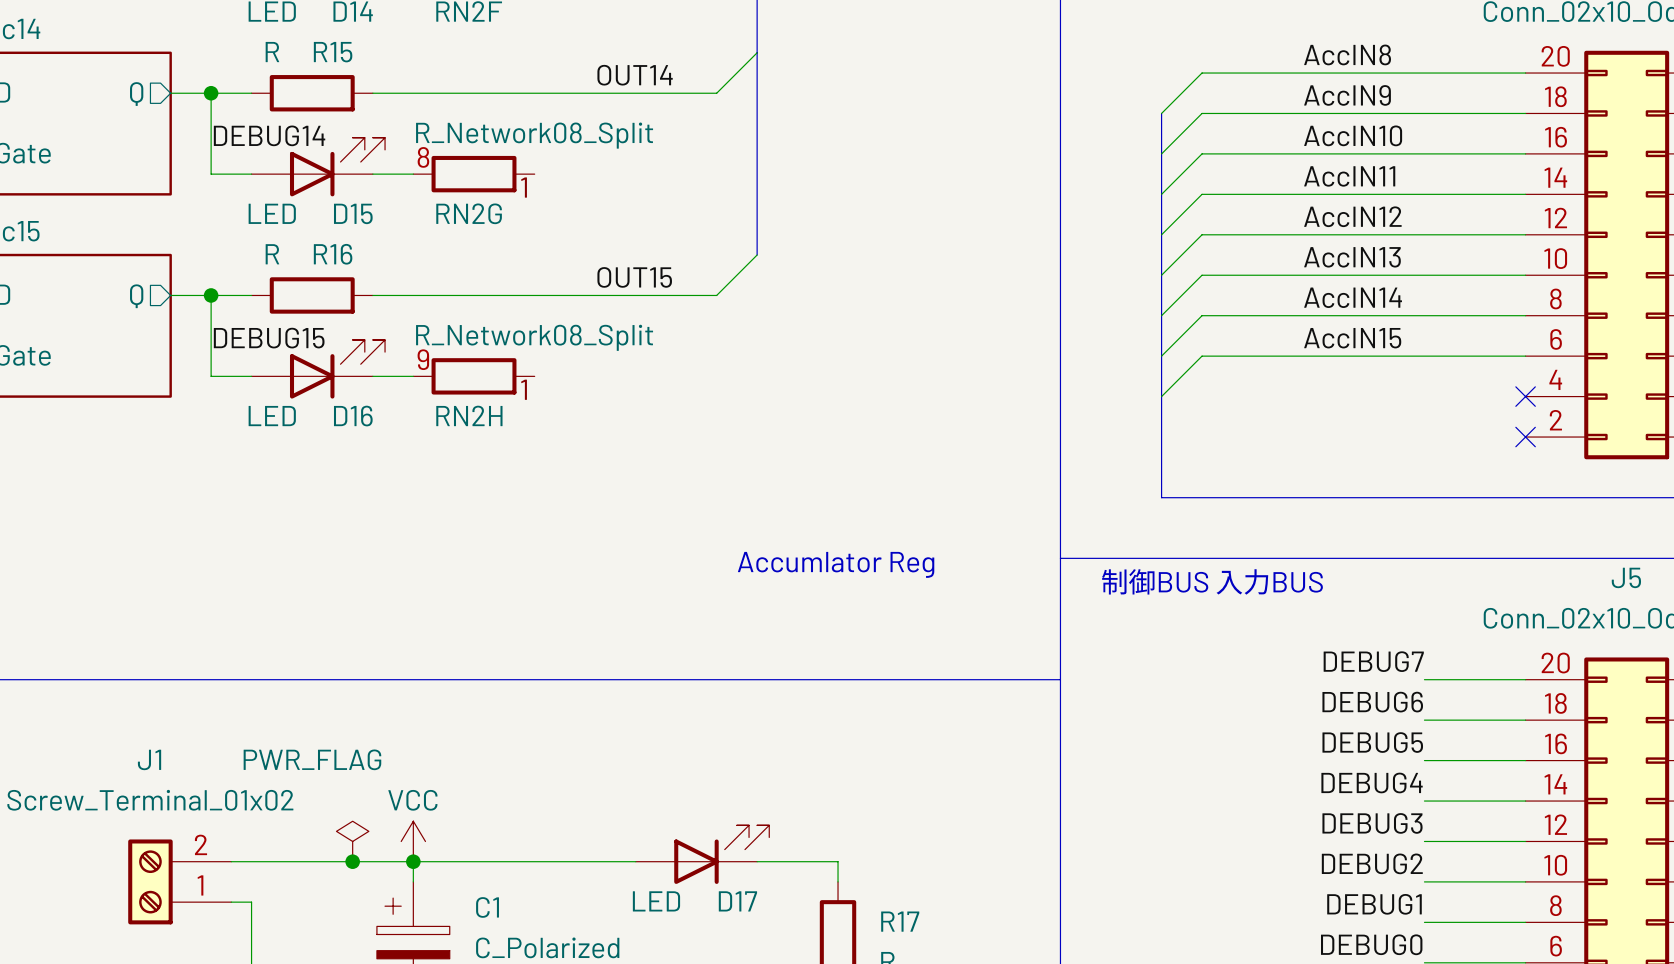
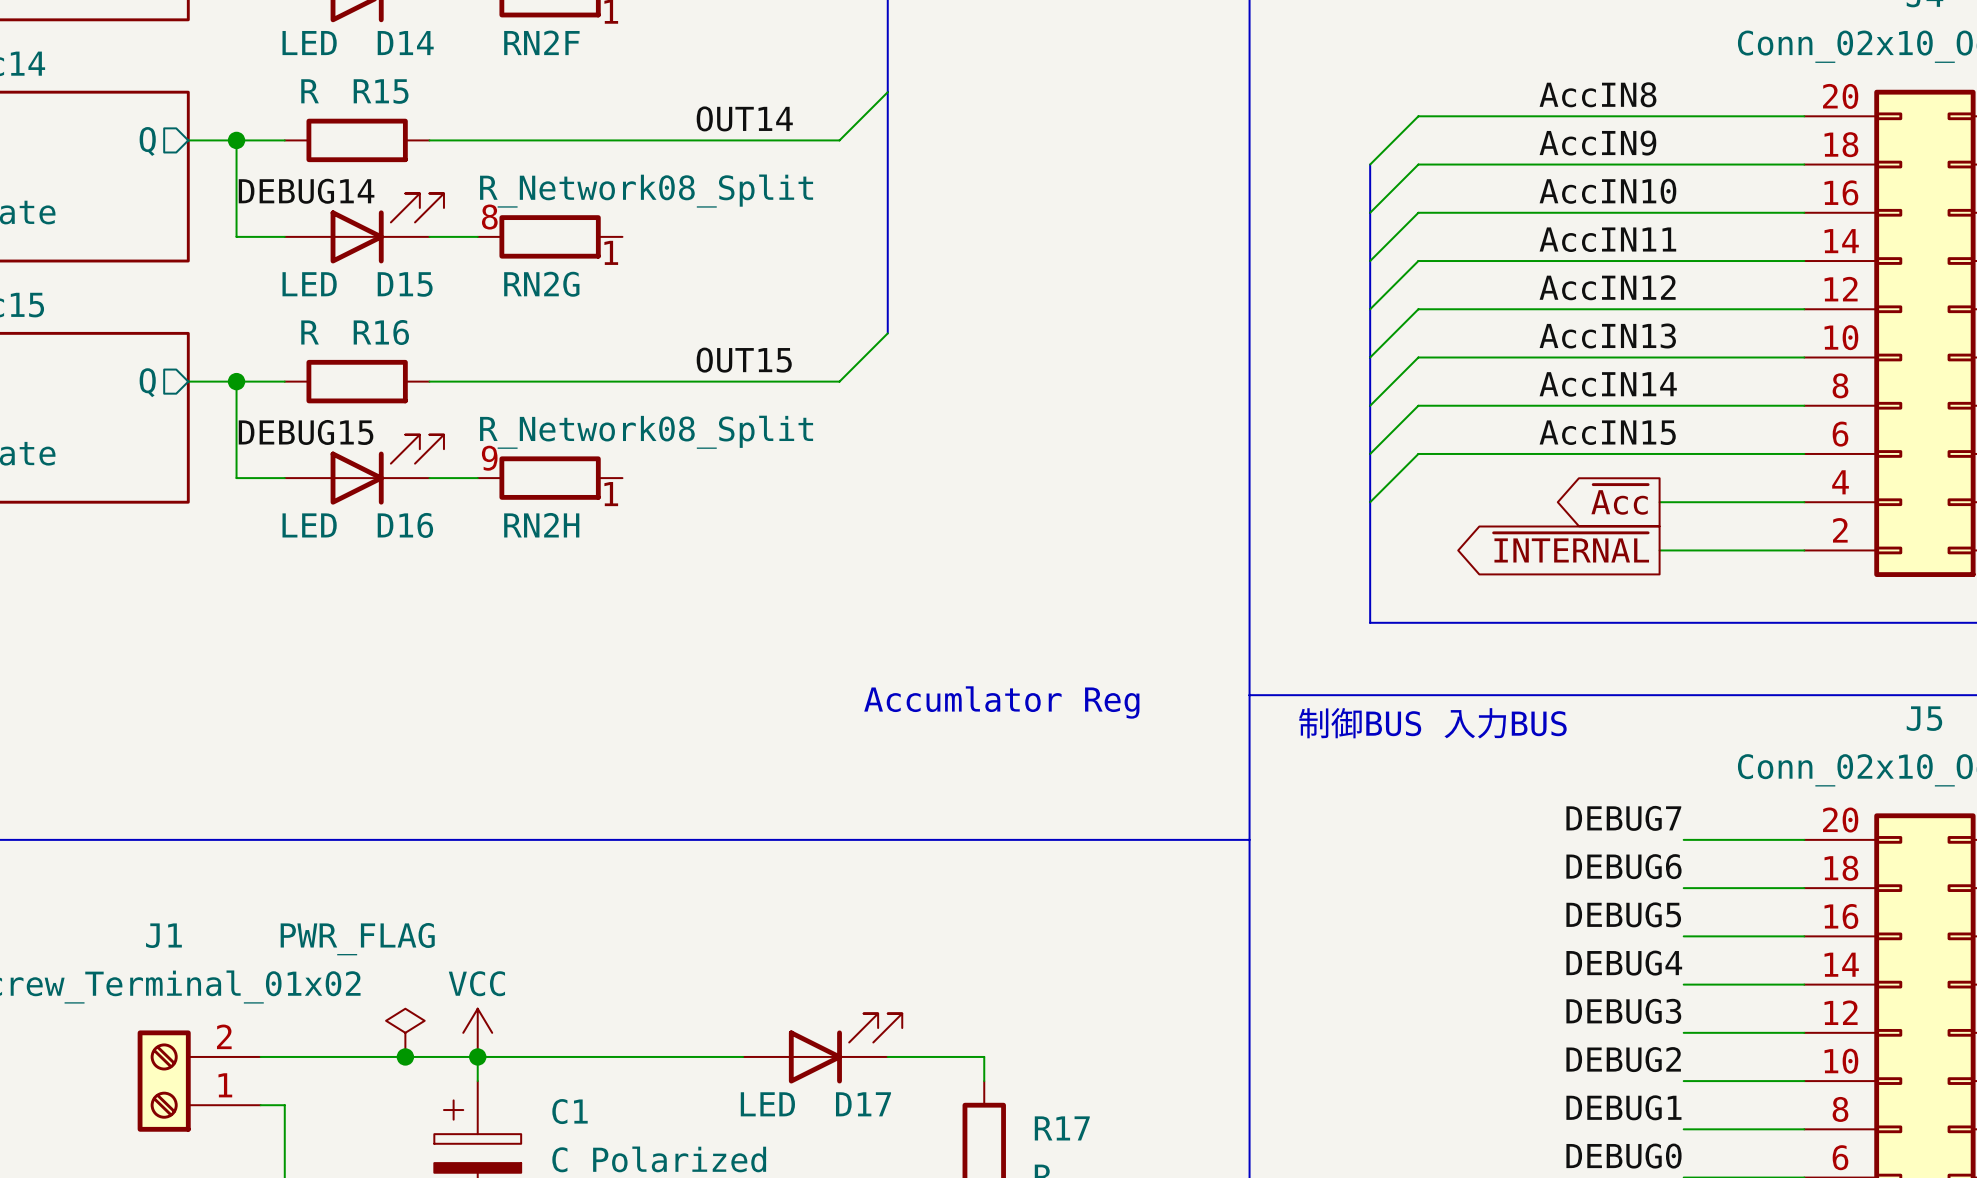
global label: none -> ~{Acc} (1619, 499)
wire: none -> (1659, 502) (1804, 502)
no-connect mark: (1525, 396) -> none
global label: none -> ~{INTERNAL} (1571, 547)
wire: none -> (1659, 550) (1804, 550)
no-connect mark: (1525, 437) -> none

